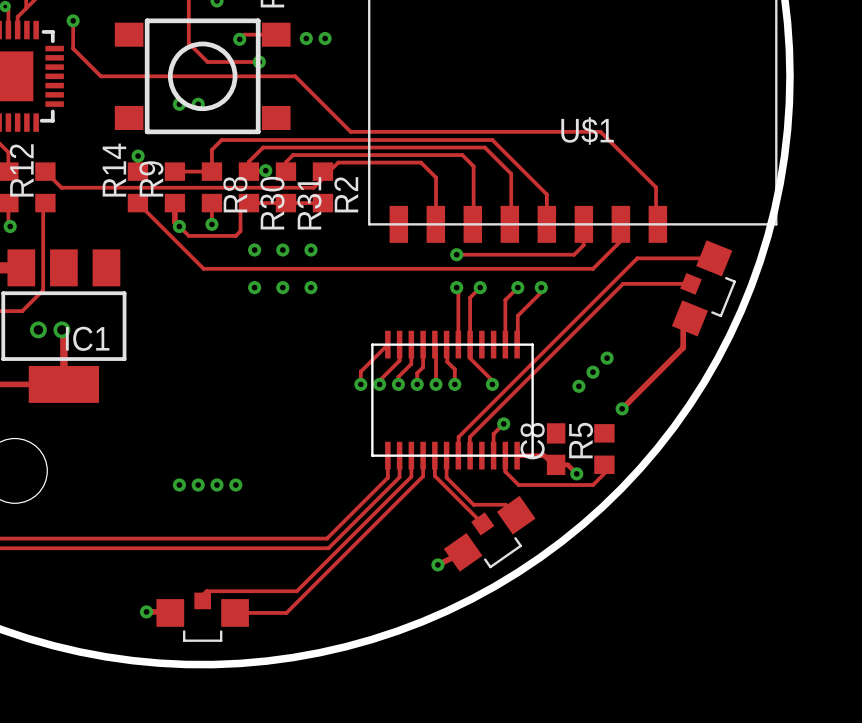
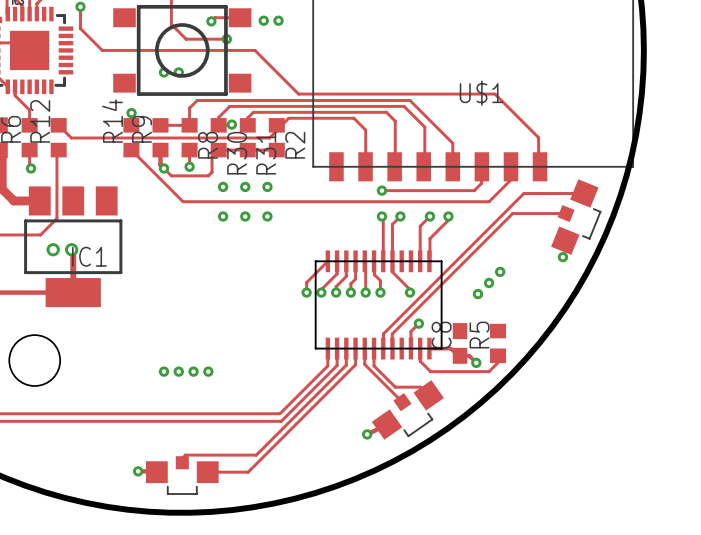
track: (683, 325) (683, 347) (622, 408) -> none
via position: (622, 408) -> (562, 257)

